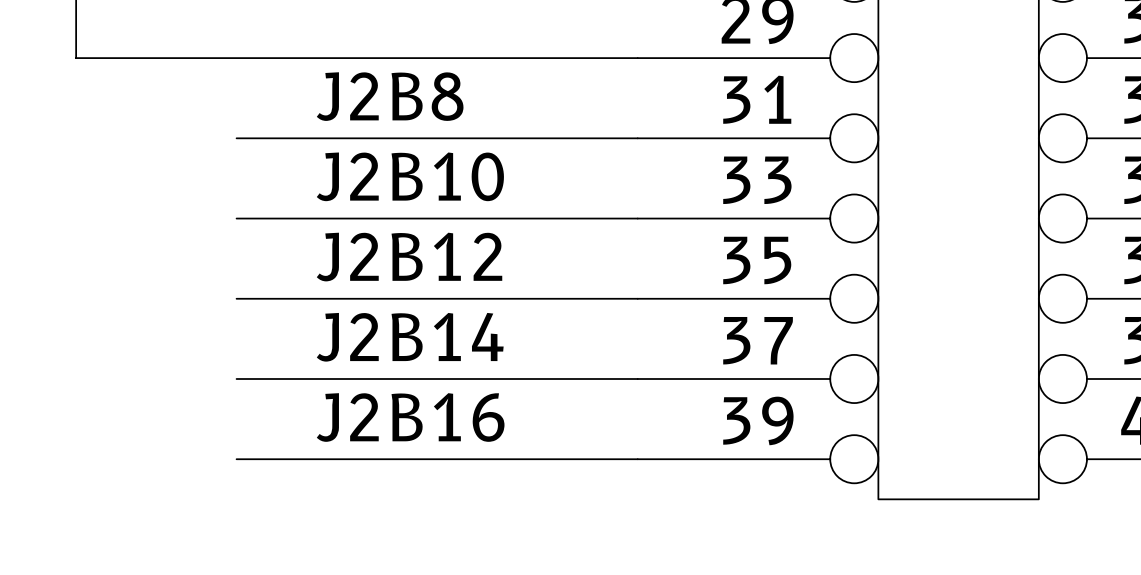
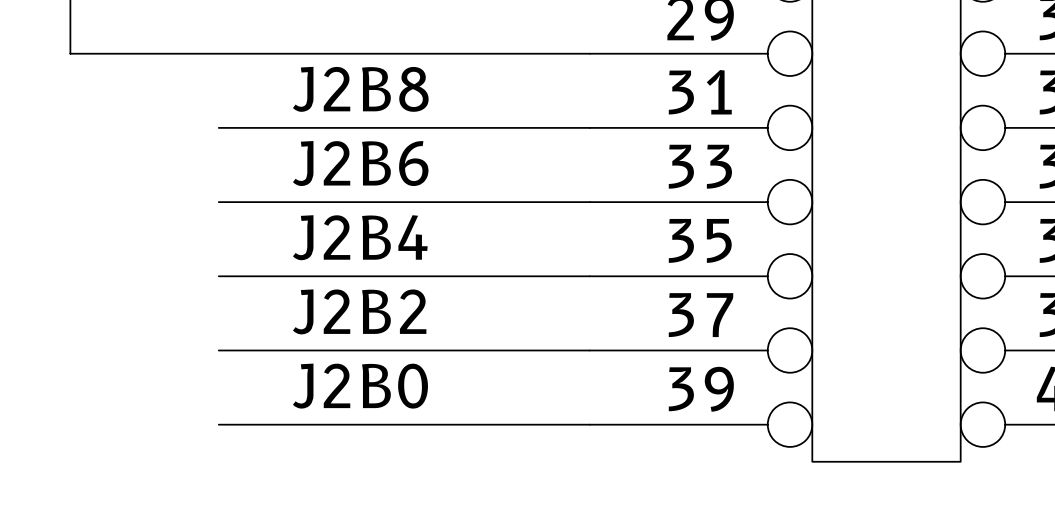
label: J2B10 (410, 176) -> J2B6 (360, 163)
label: J2B12 (409, 257) -> J2B4 (360, 237)
label: J2B14 (410, 337) -> J2B2 (359, 311)
label: J2B16 (410, 417) -> J2B0 (360, 386)

